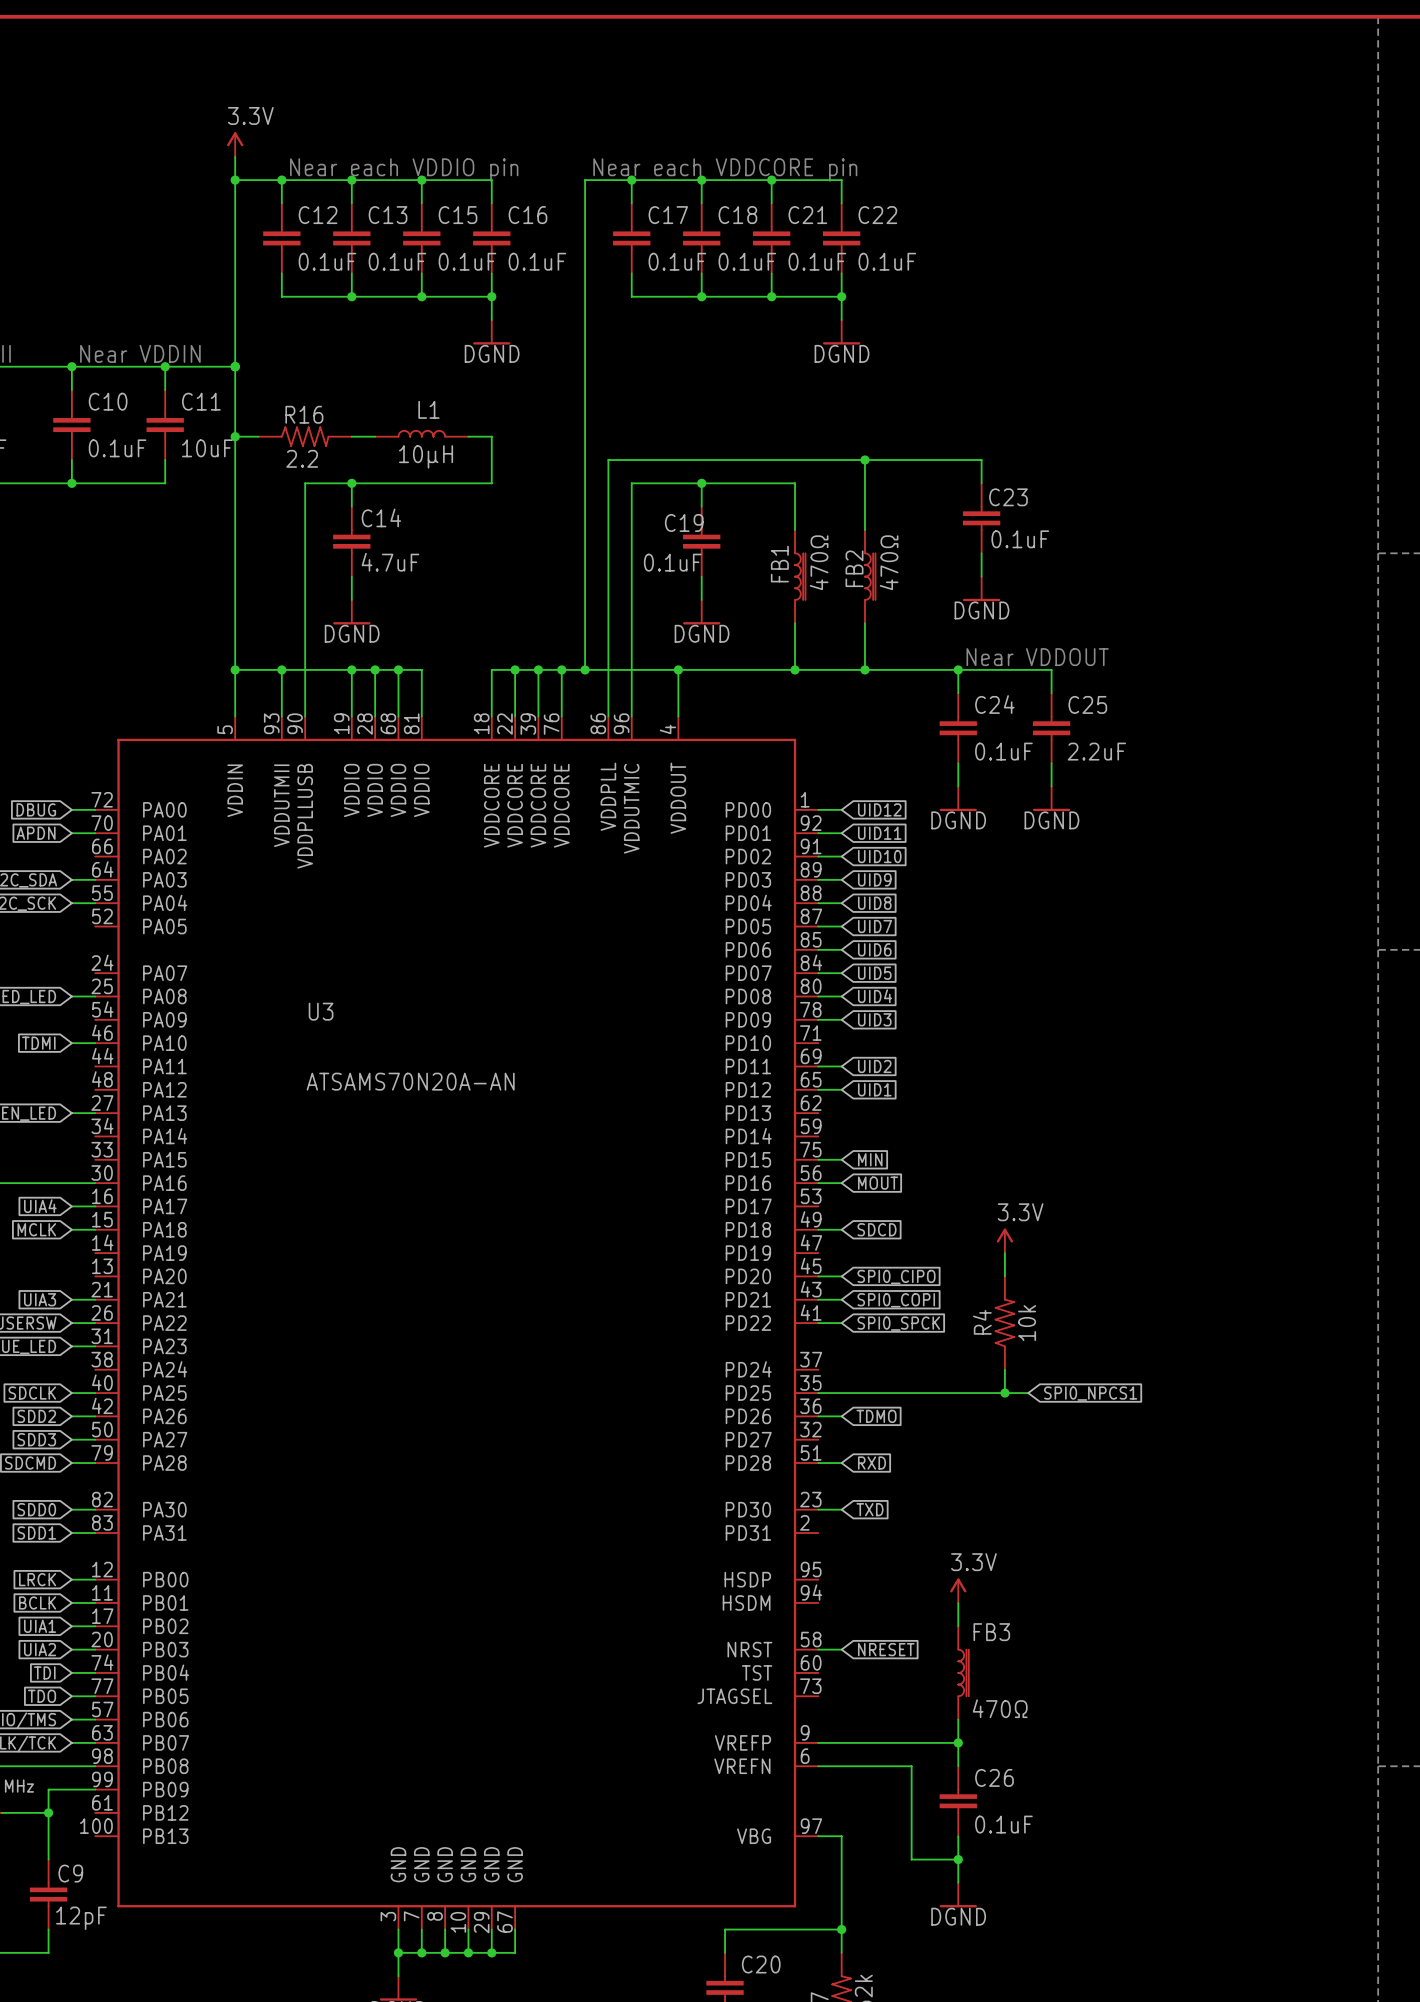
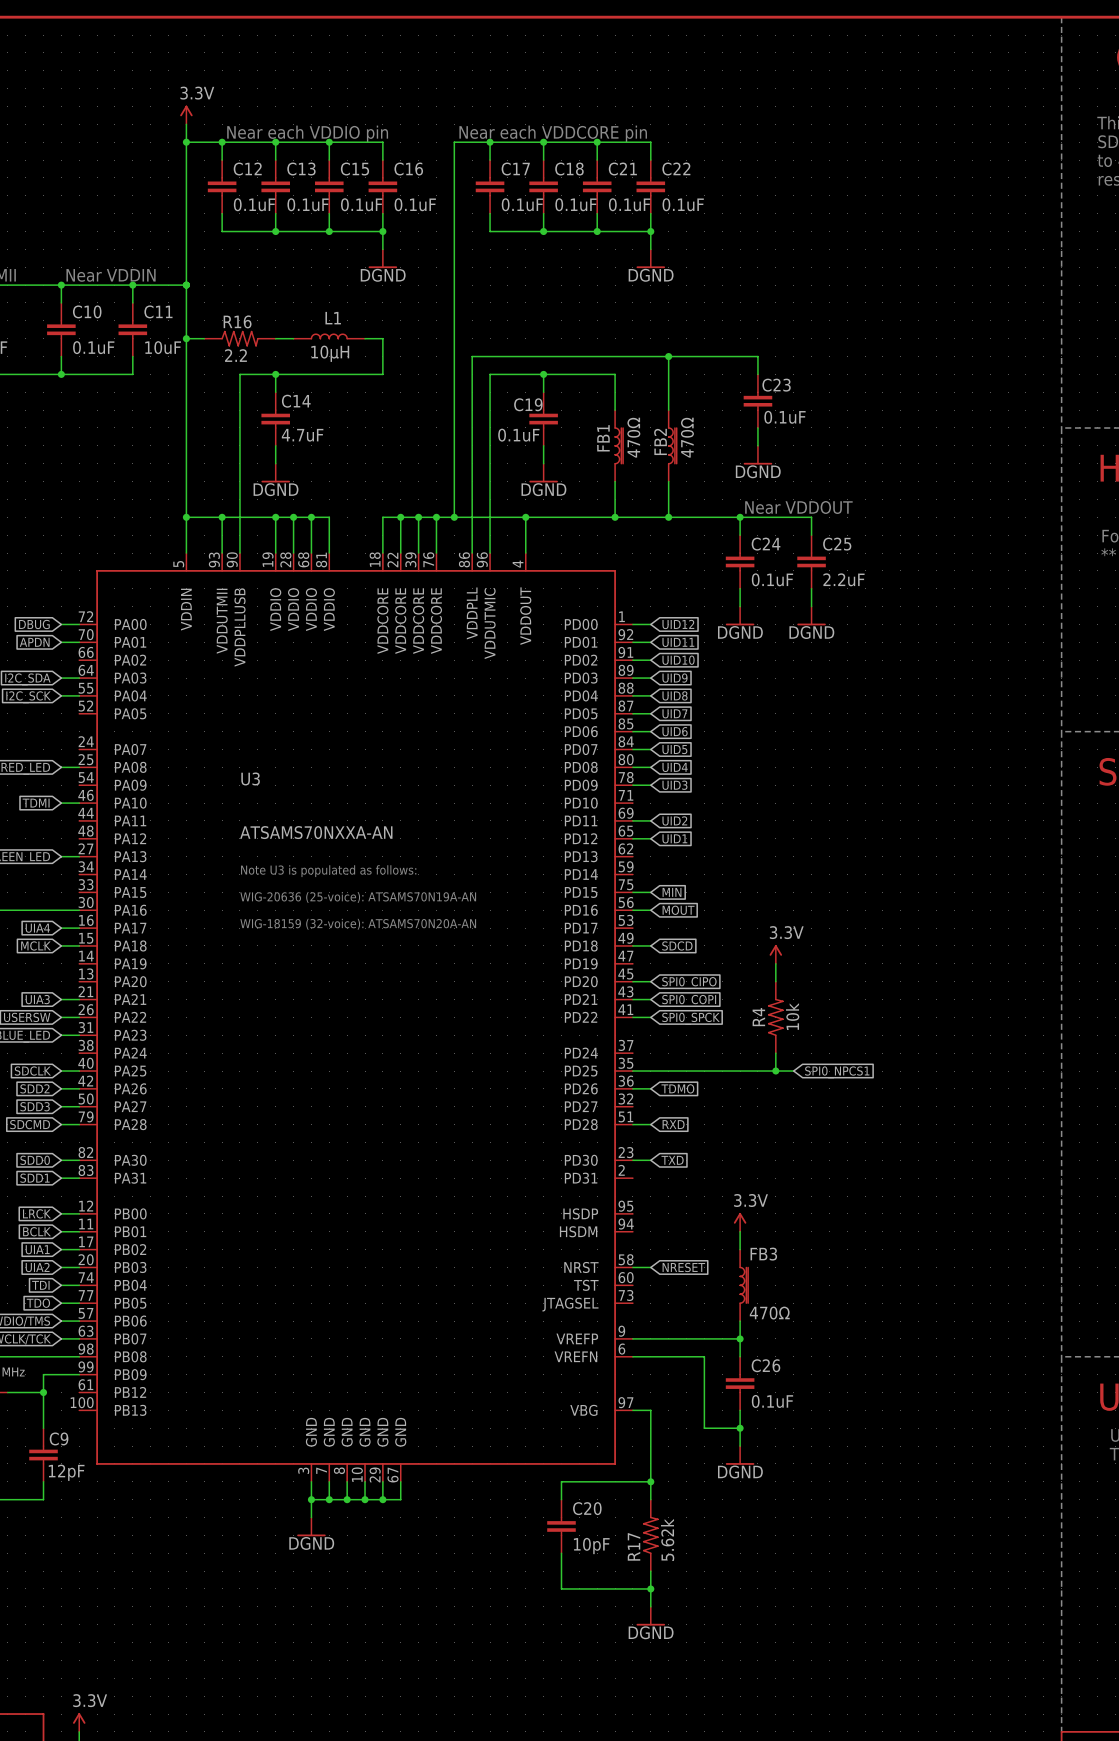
U3 value: ATSAMS70N20A-AN (410, 1081) -> ATSAMS70NXXA-AN (316, 832)
text: none -> Note U3 is populated as follows: (328, 871)
text: none -> WIG-20636 (25-voice): ATSAMS70N19A-AN (358, 897)
text: none -> WIG-18159 (32-voice): ATSAMS70N20A-AN (358, 924)

